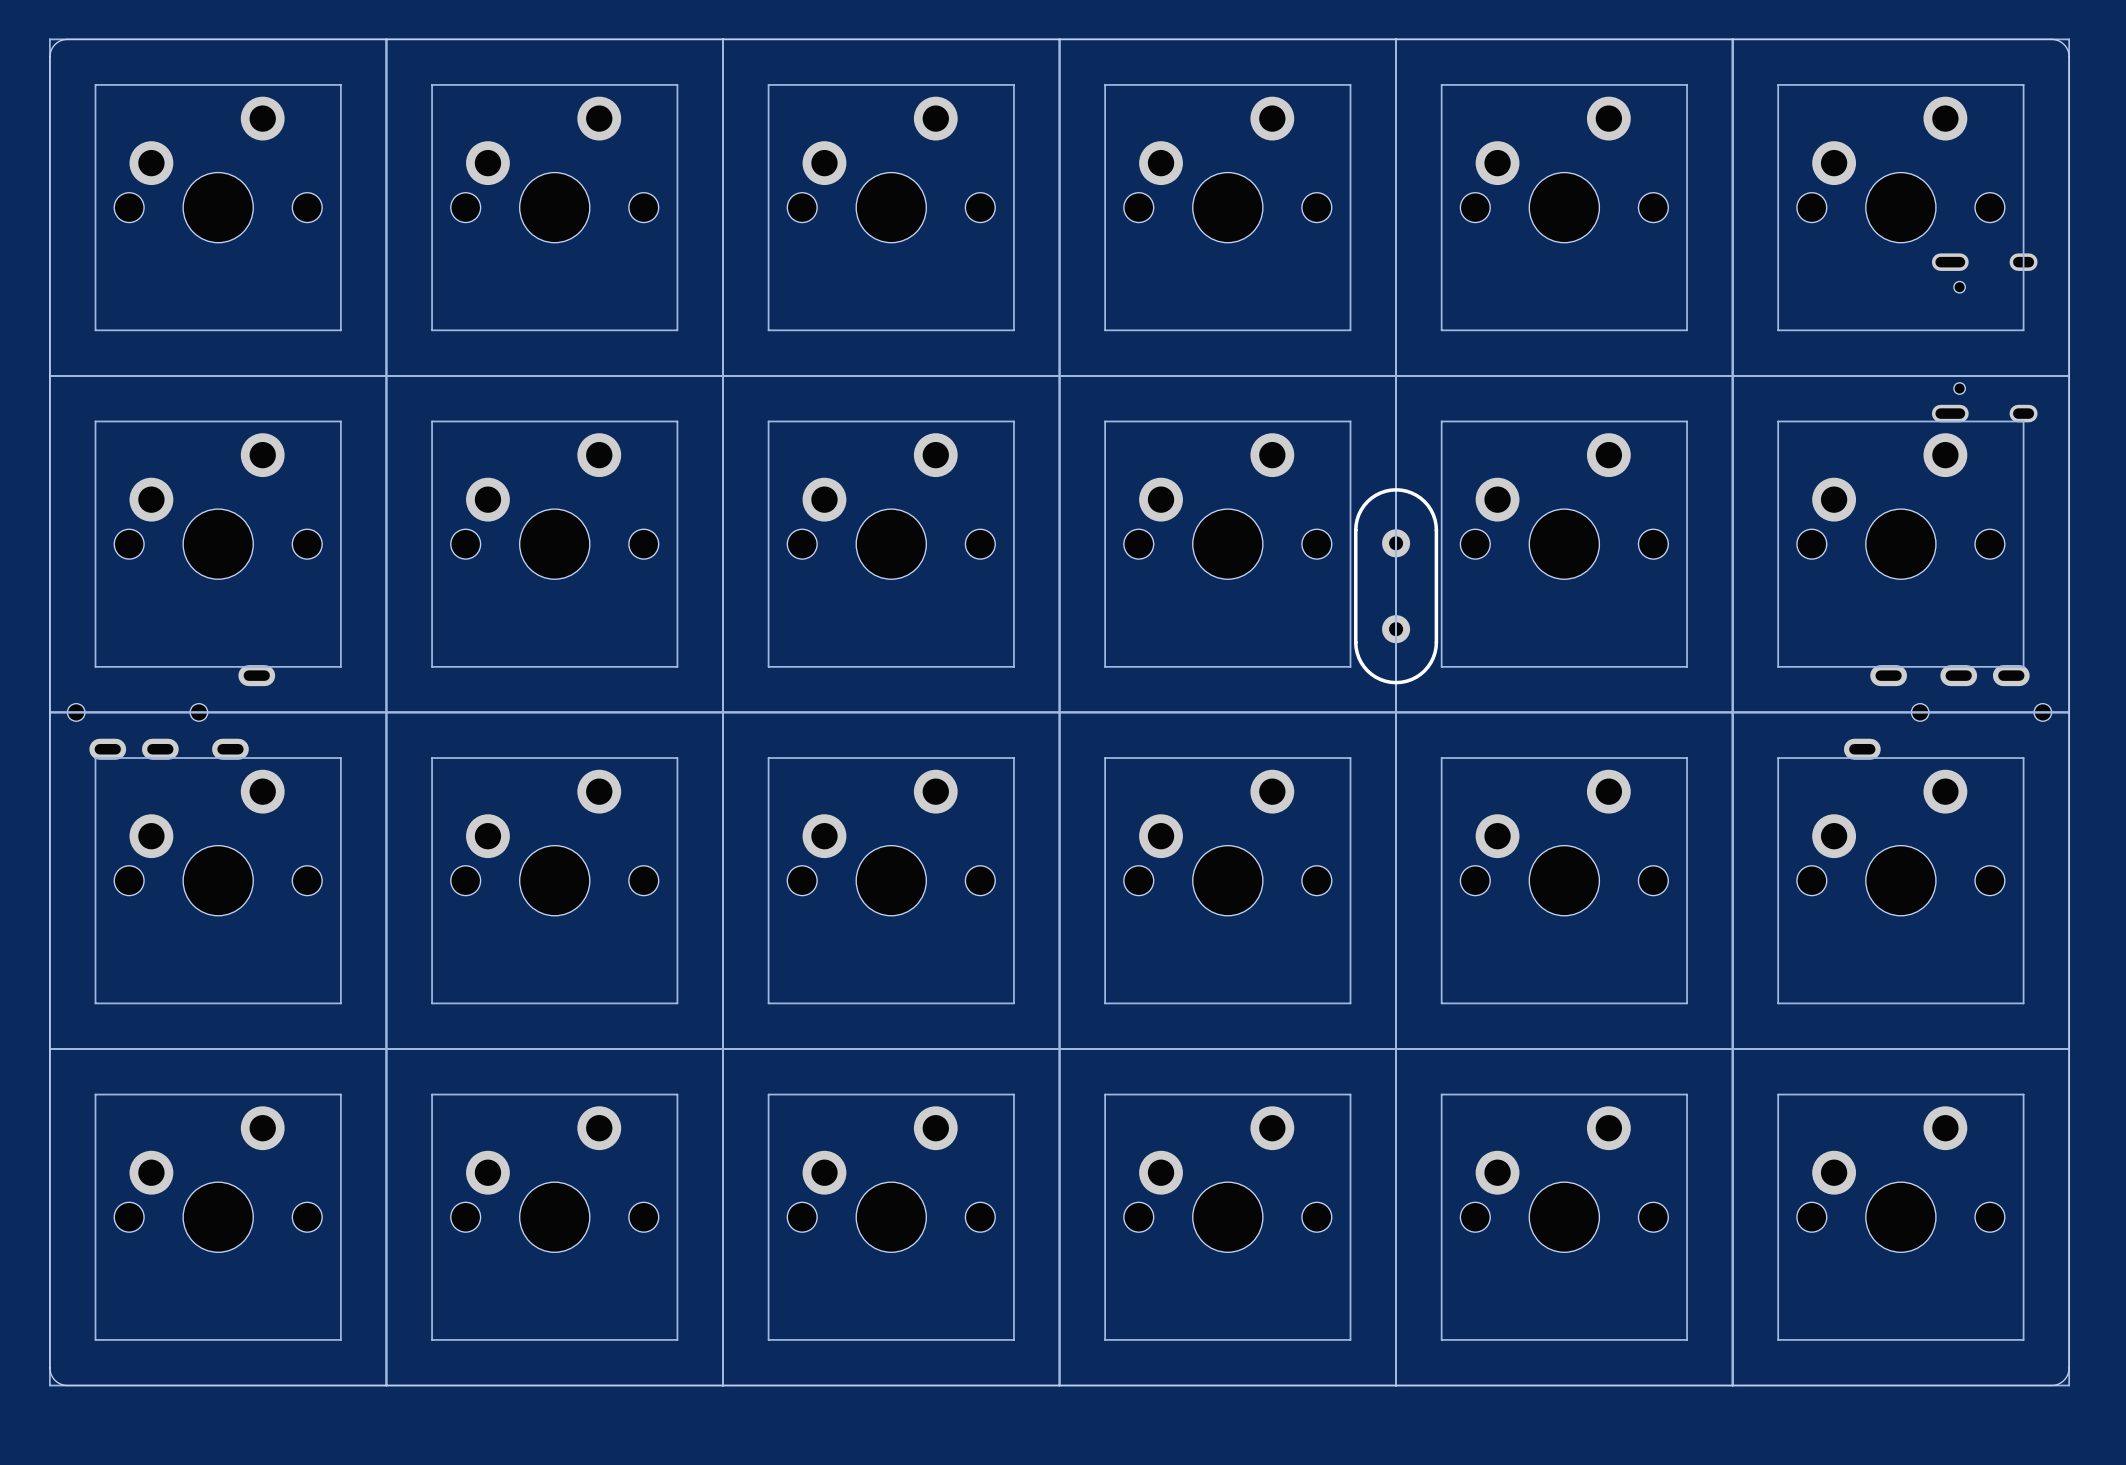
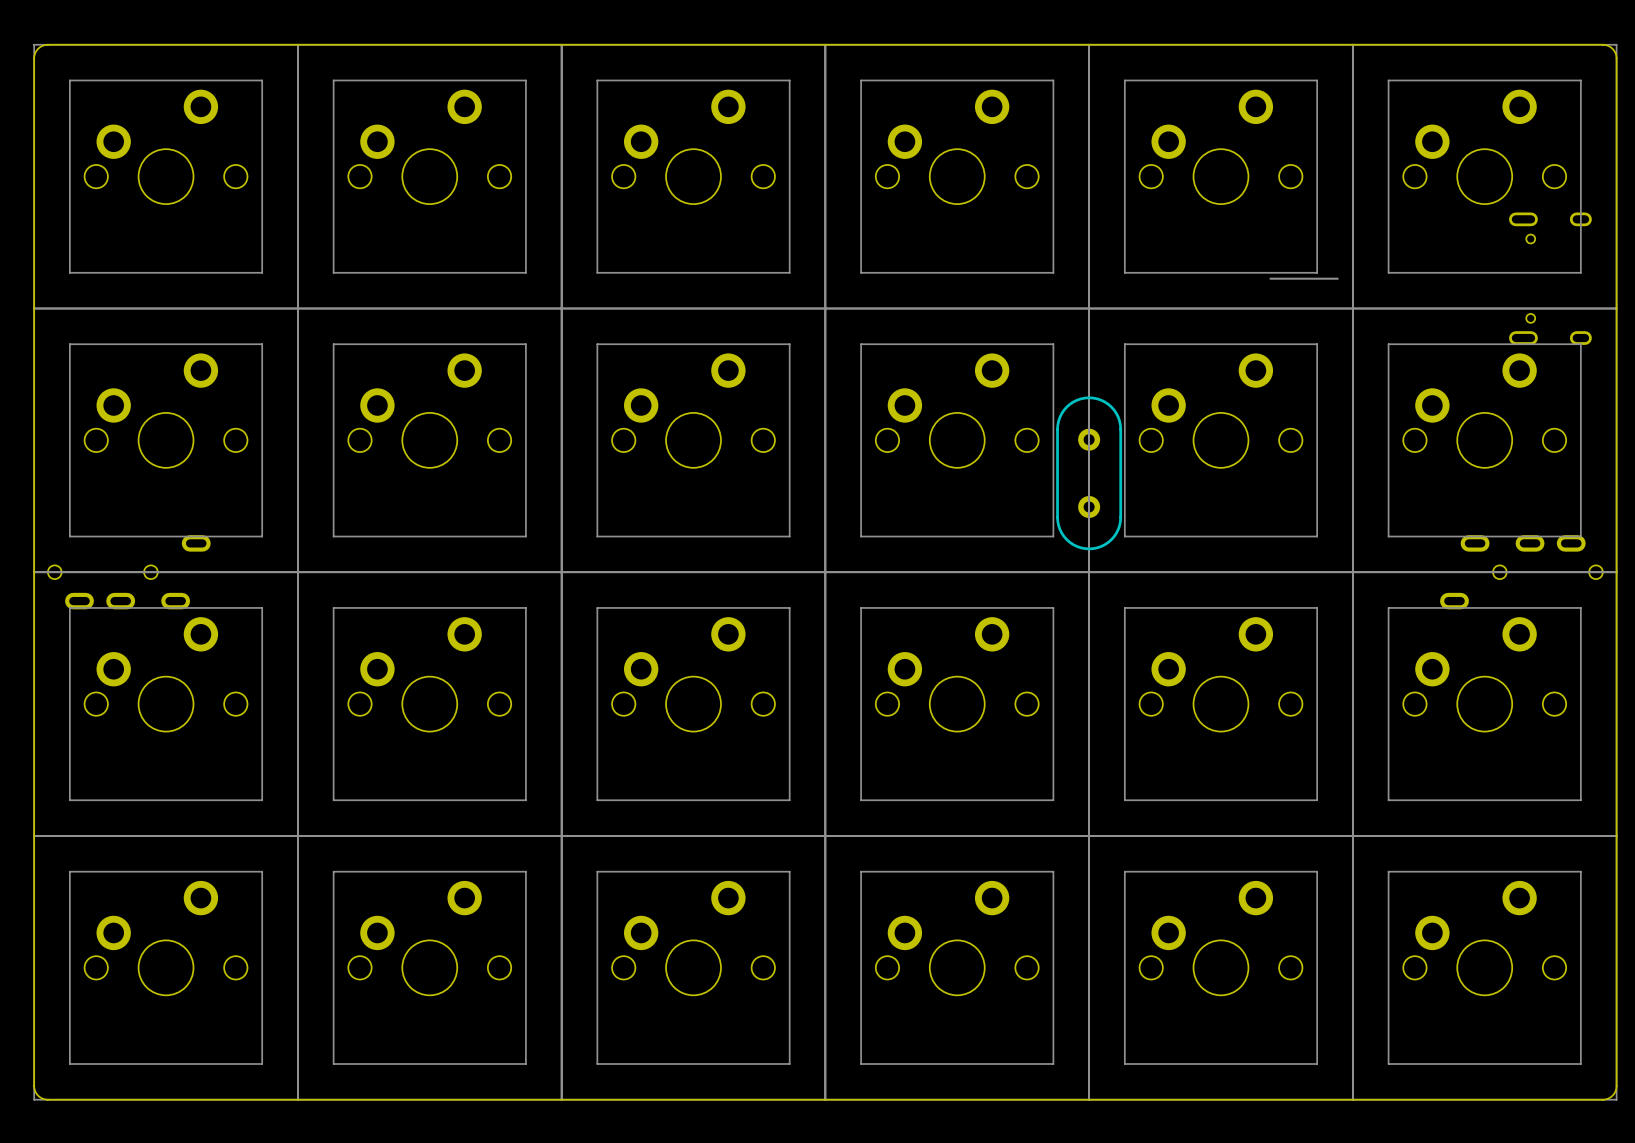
line: none -> (1270, 278) (1337, 278)

